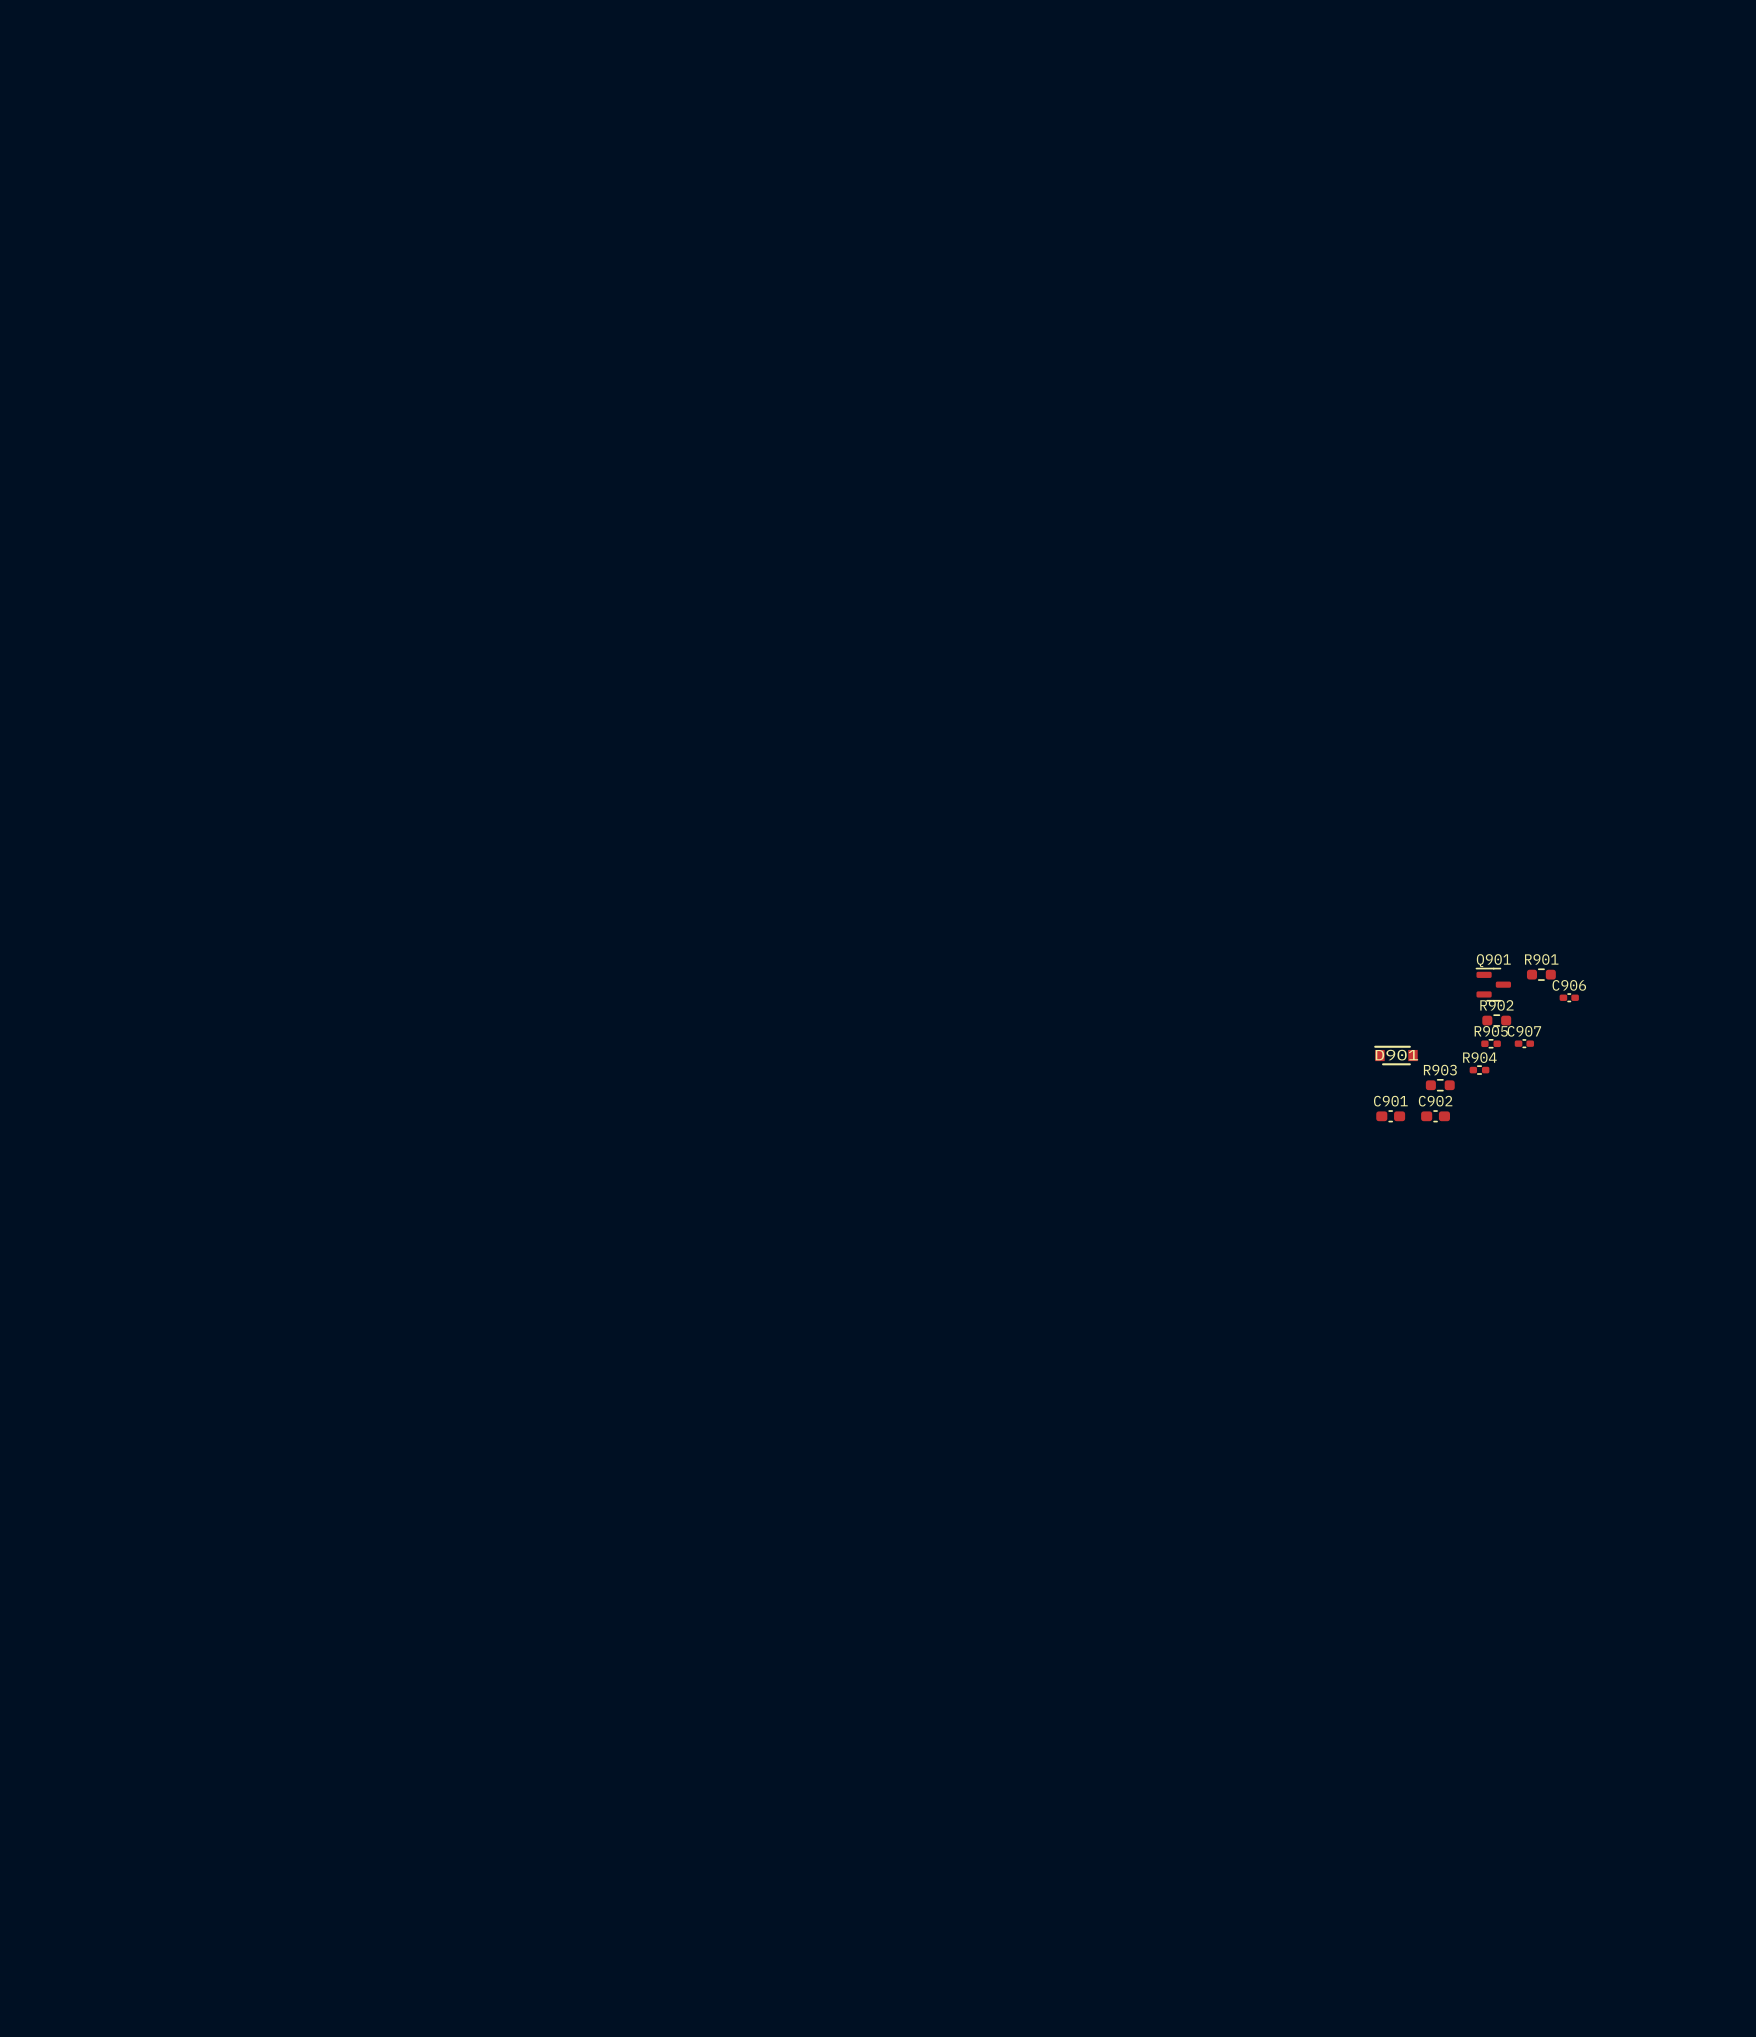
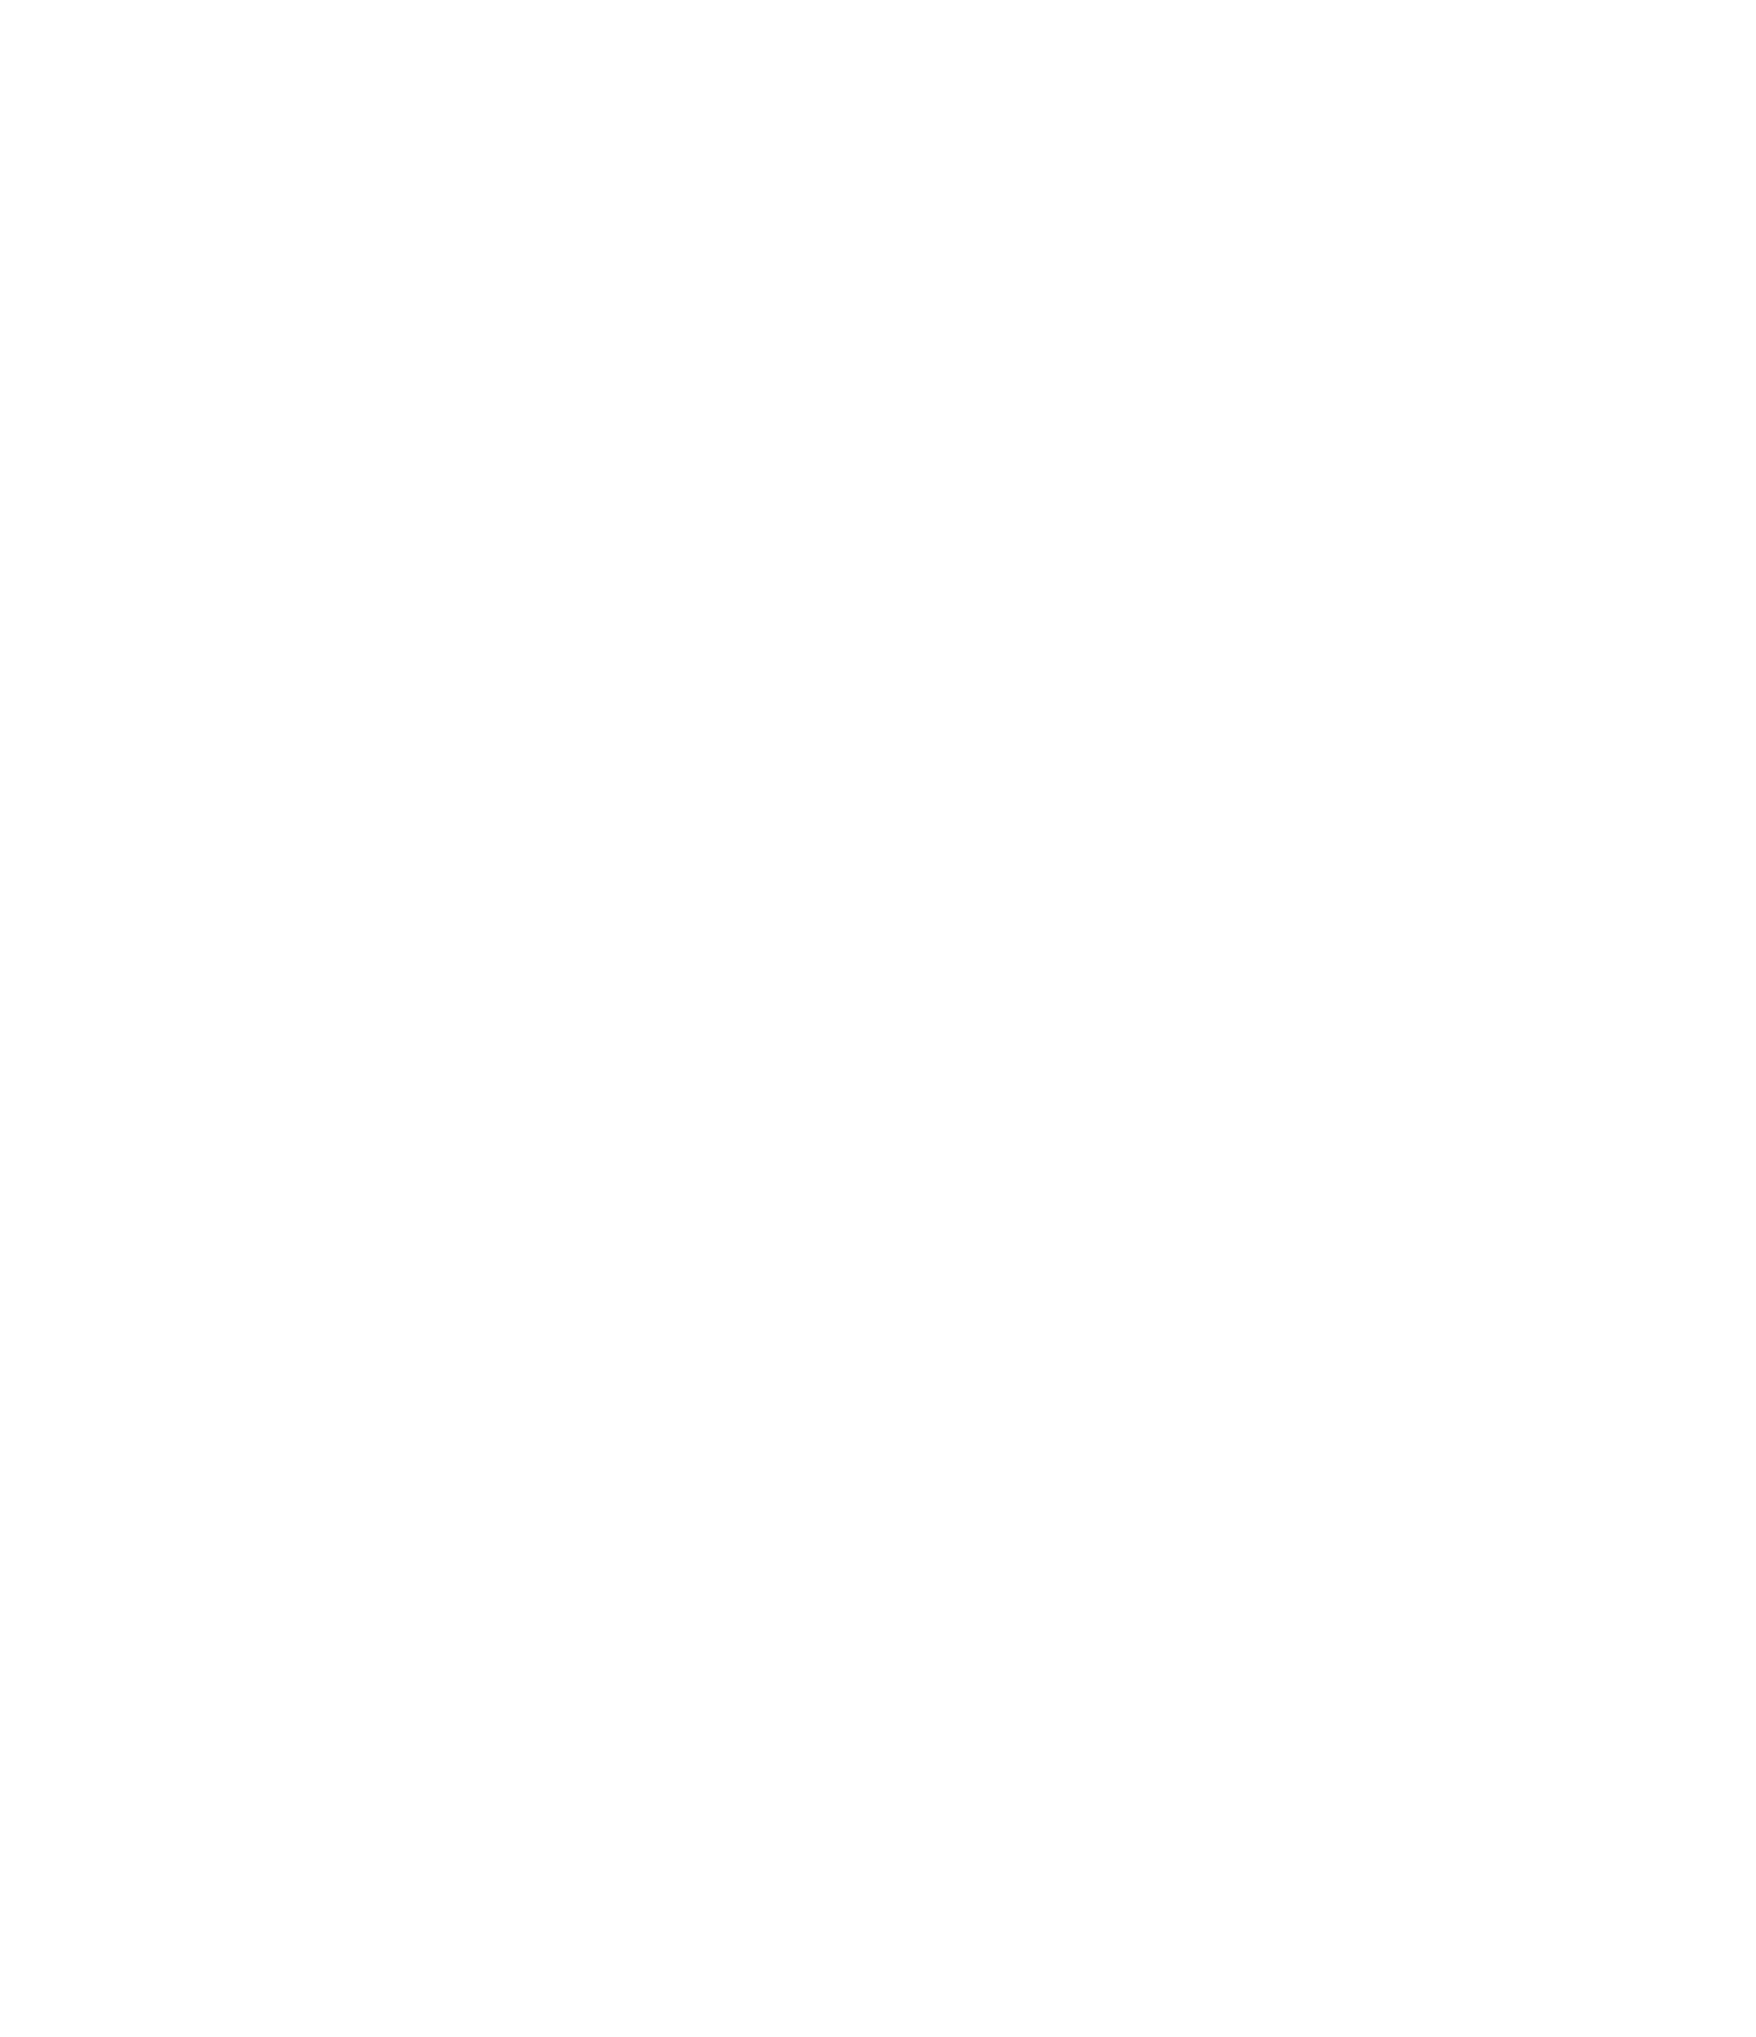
R901: (1541, 974) -> none
Q901: (1493, 984) -> none
C906: (1569, 997) -> none
R902: (1496, 1020) -> none
R905: (1491, 1043) -> none
C907: (1524, 1043) -> none
D901: (1395, 1055) -> none
R904: (1479, 1070) -> none
R903: (1440, 1085) -> none
C901: (1390, 1116) -> none
C902: (1435, 1116) -> none

